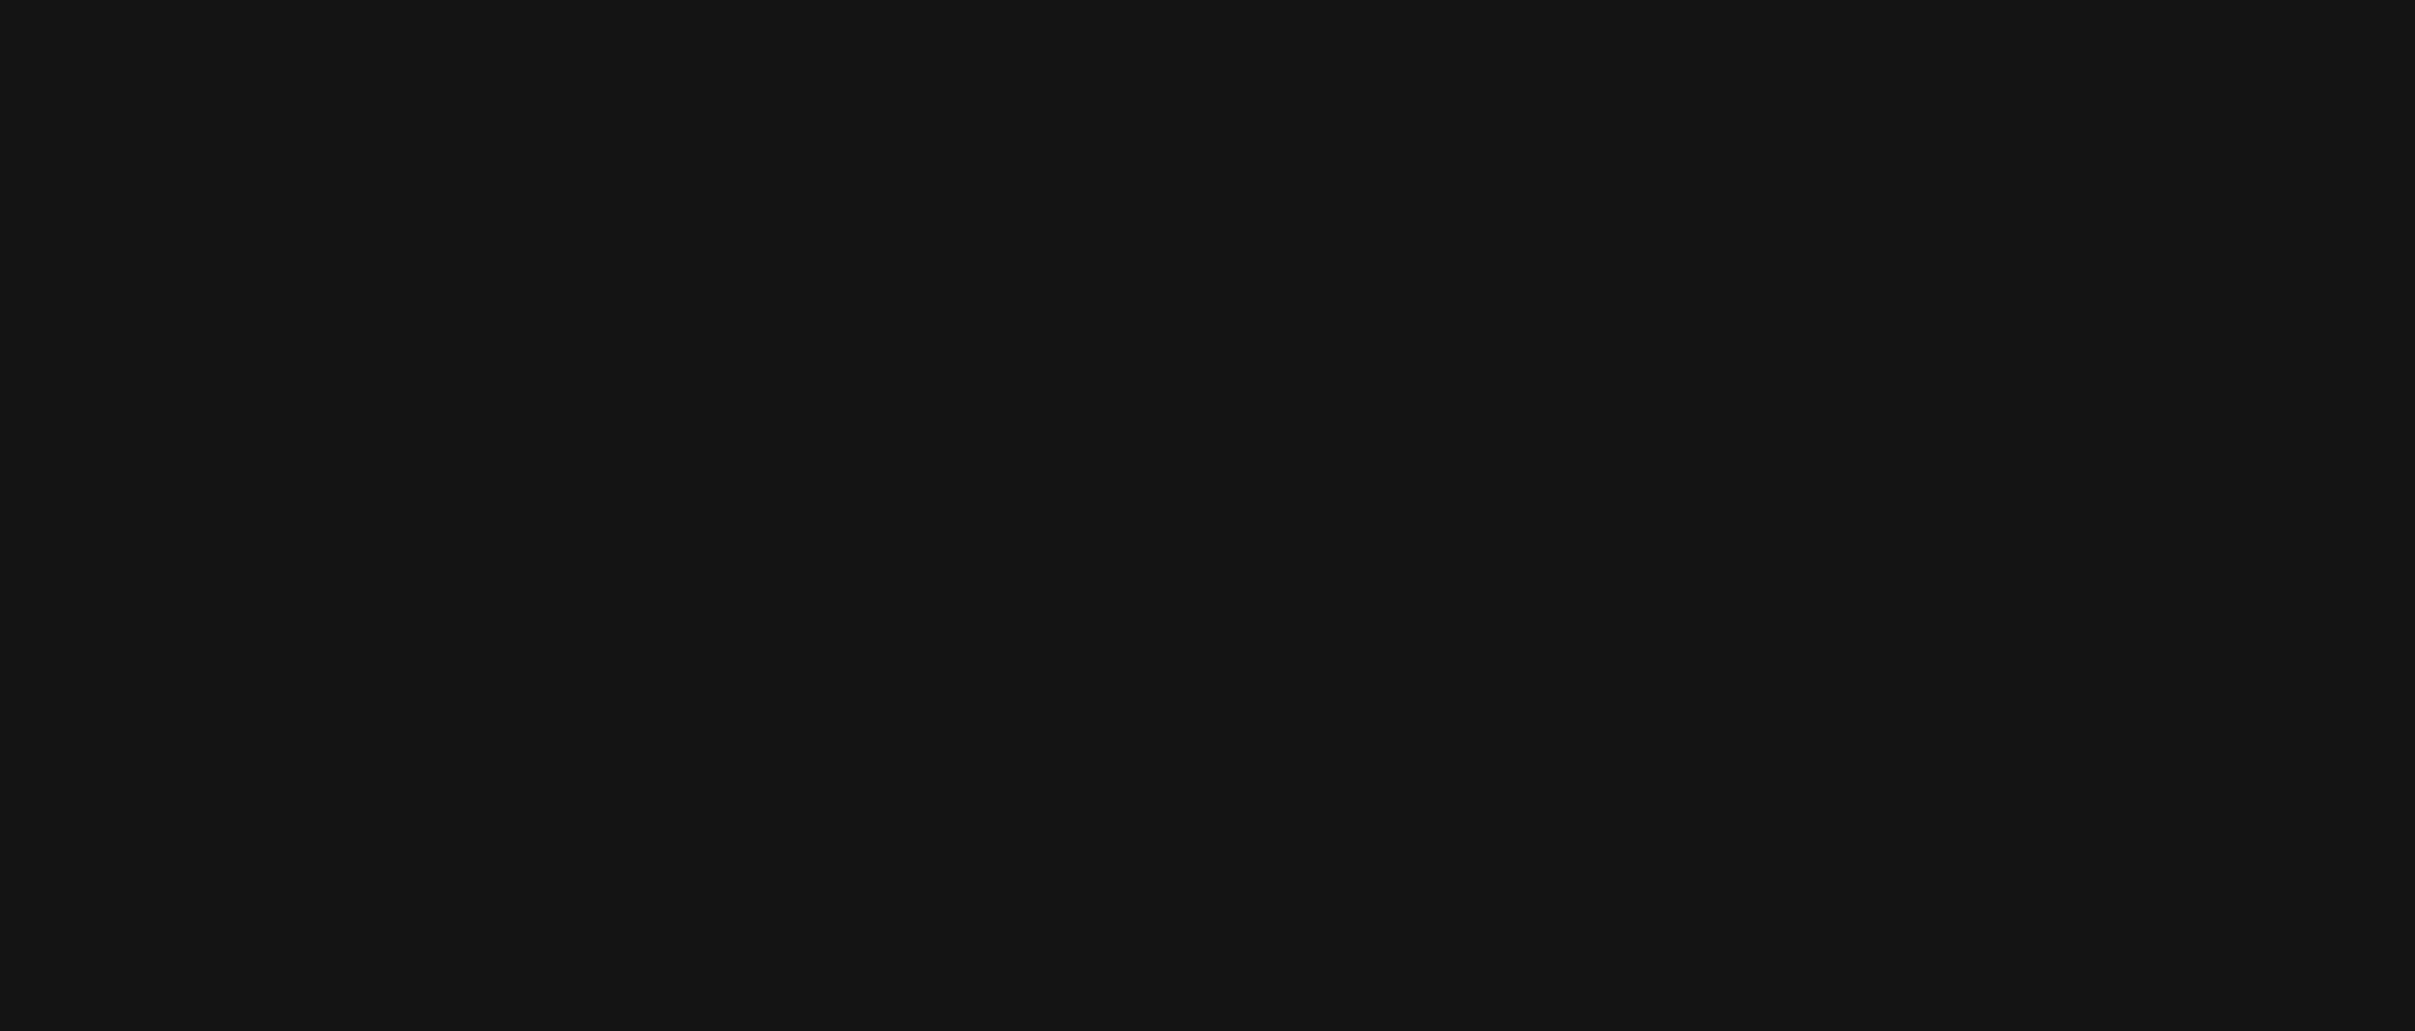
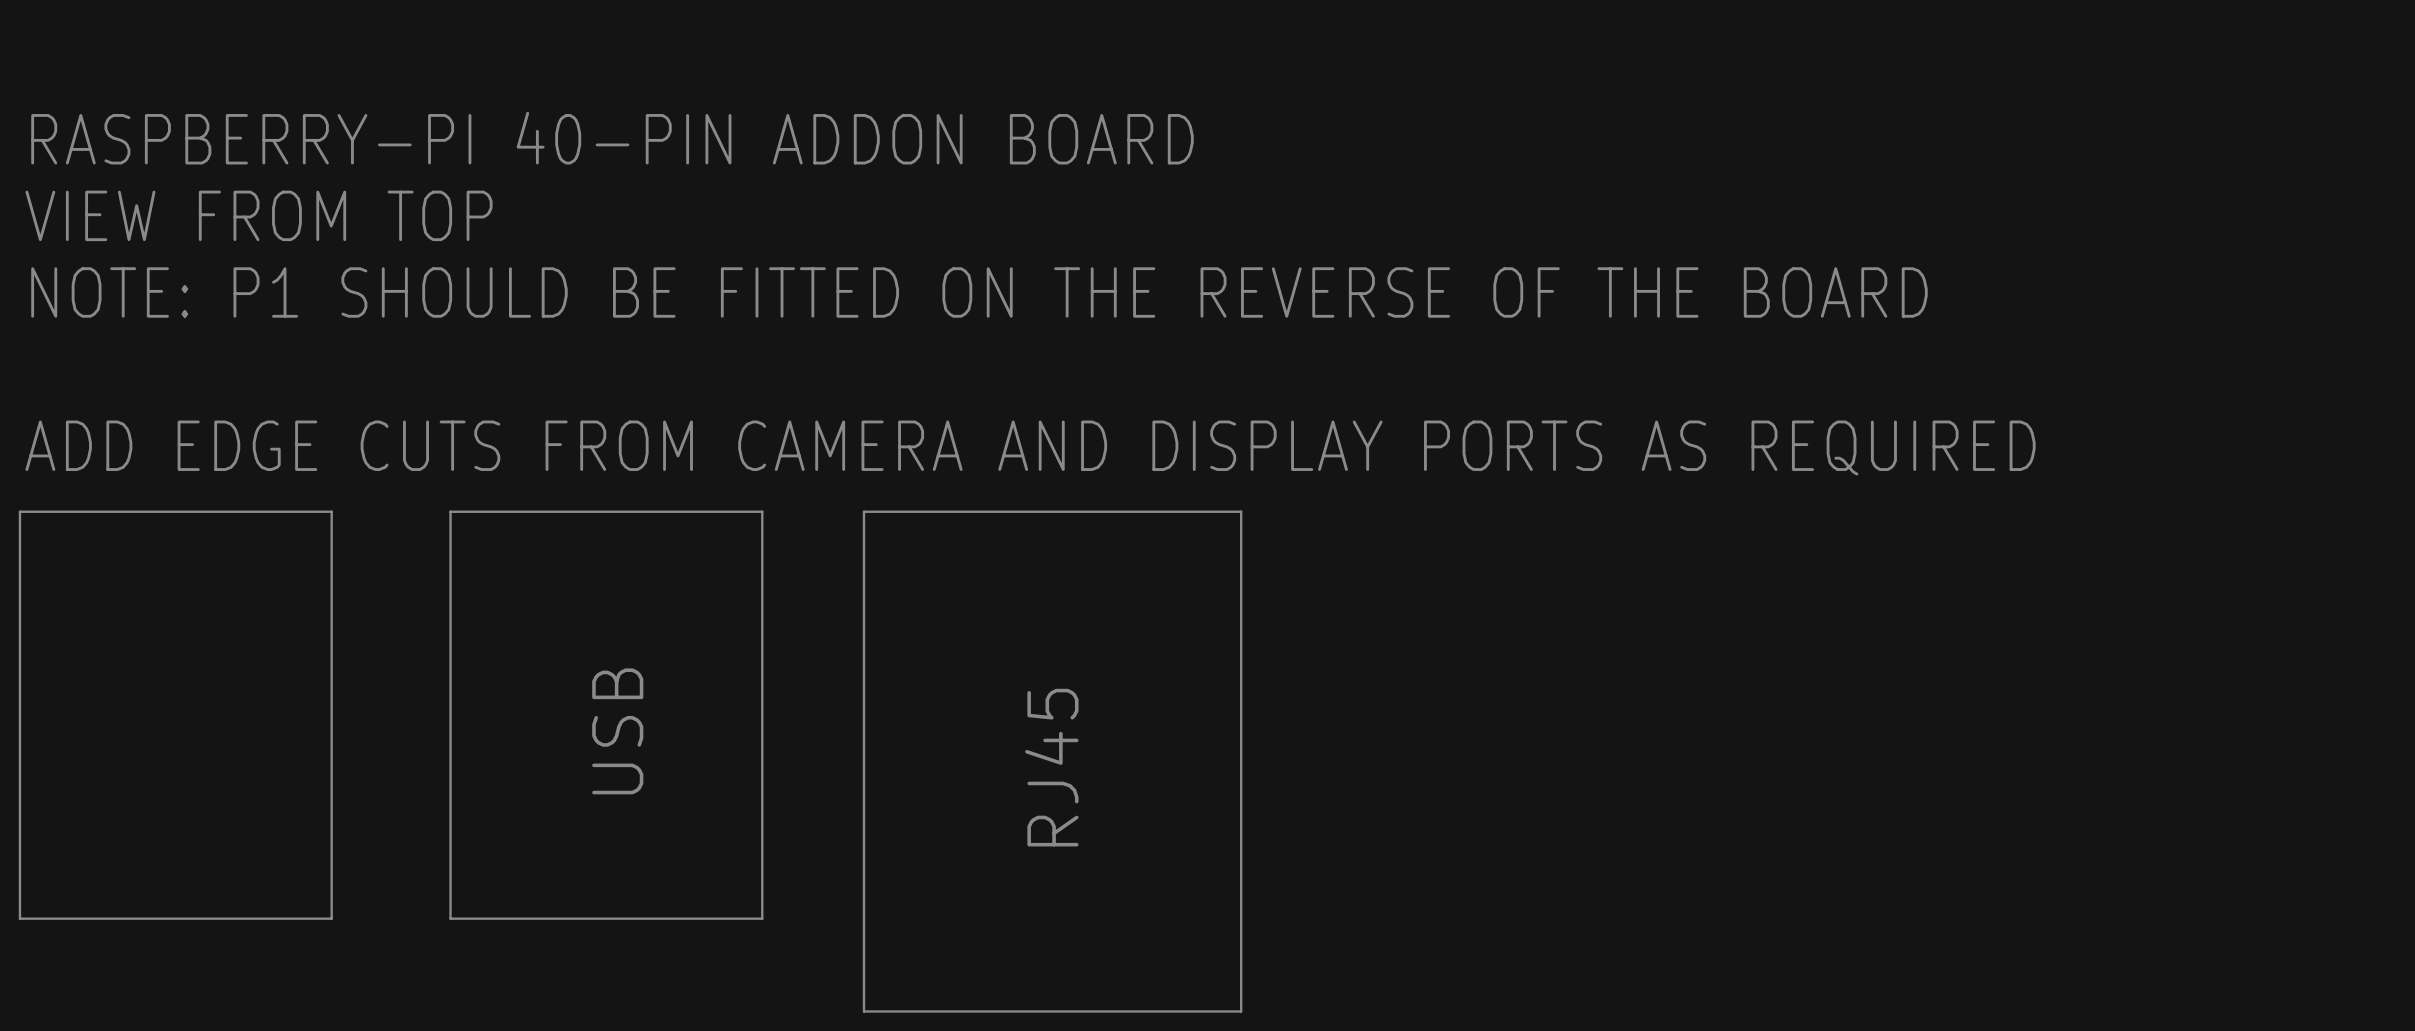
text: none -> RASPBERRY-PI 40-PIN ADDON BOARD (612, 138)
text: none -> VIEW FROM TOP (259, 215)
text: none -> NOTE: P1 SHOULD BE FITTED ON THE REVERSE OF THE BOARD (979, 292)
text: none -> ADD EDGE CUTS FROM CAMERA AND DISPLAY PORTS AS REQUIRED (1030, 448)
line: none -> (19, 511) (331, 511) (331, 918) (19, 918) (19, 511)
line: none -> (450, 511) (450, 918) (762, 918) (762, 511) (450, 511)
line: none -> (864, 511) (1241, 511) (1241, 1011) (864, 1011) (864, 511)
text: none -> USB (617, 731)
text: none -> RJ45 (1051, 767)

